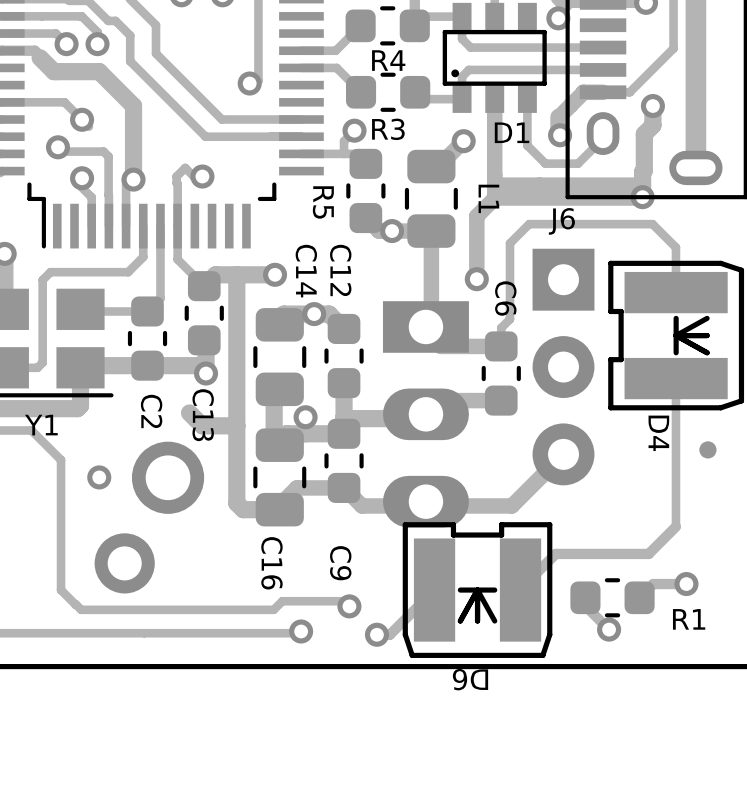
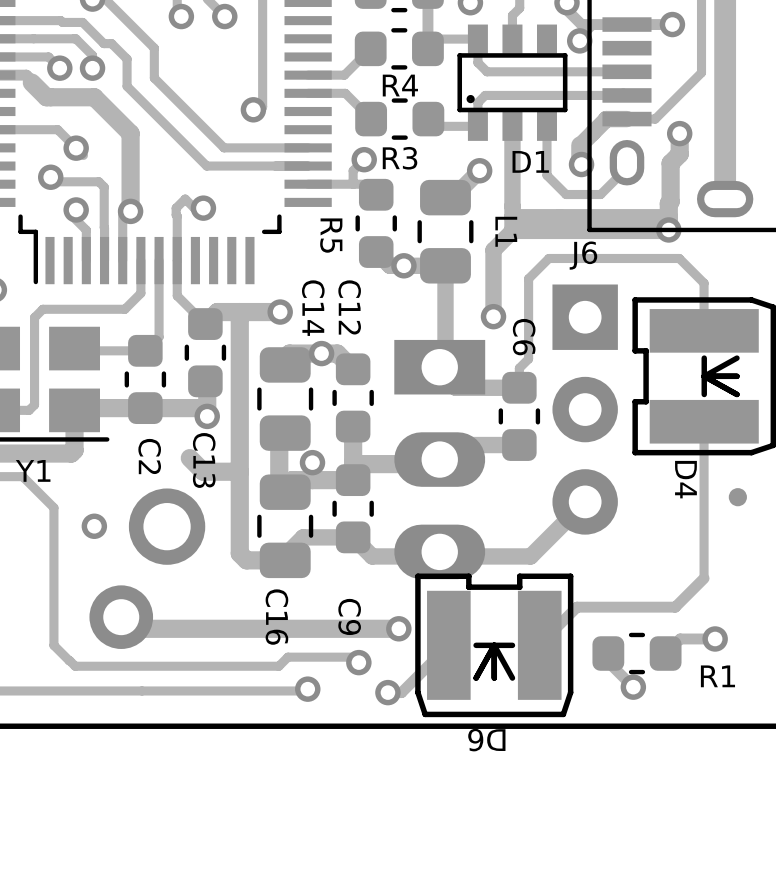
track: none -> (121, 617) (132, 628) (398, 628)
via: none -> (398, 628)

